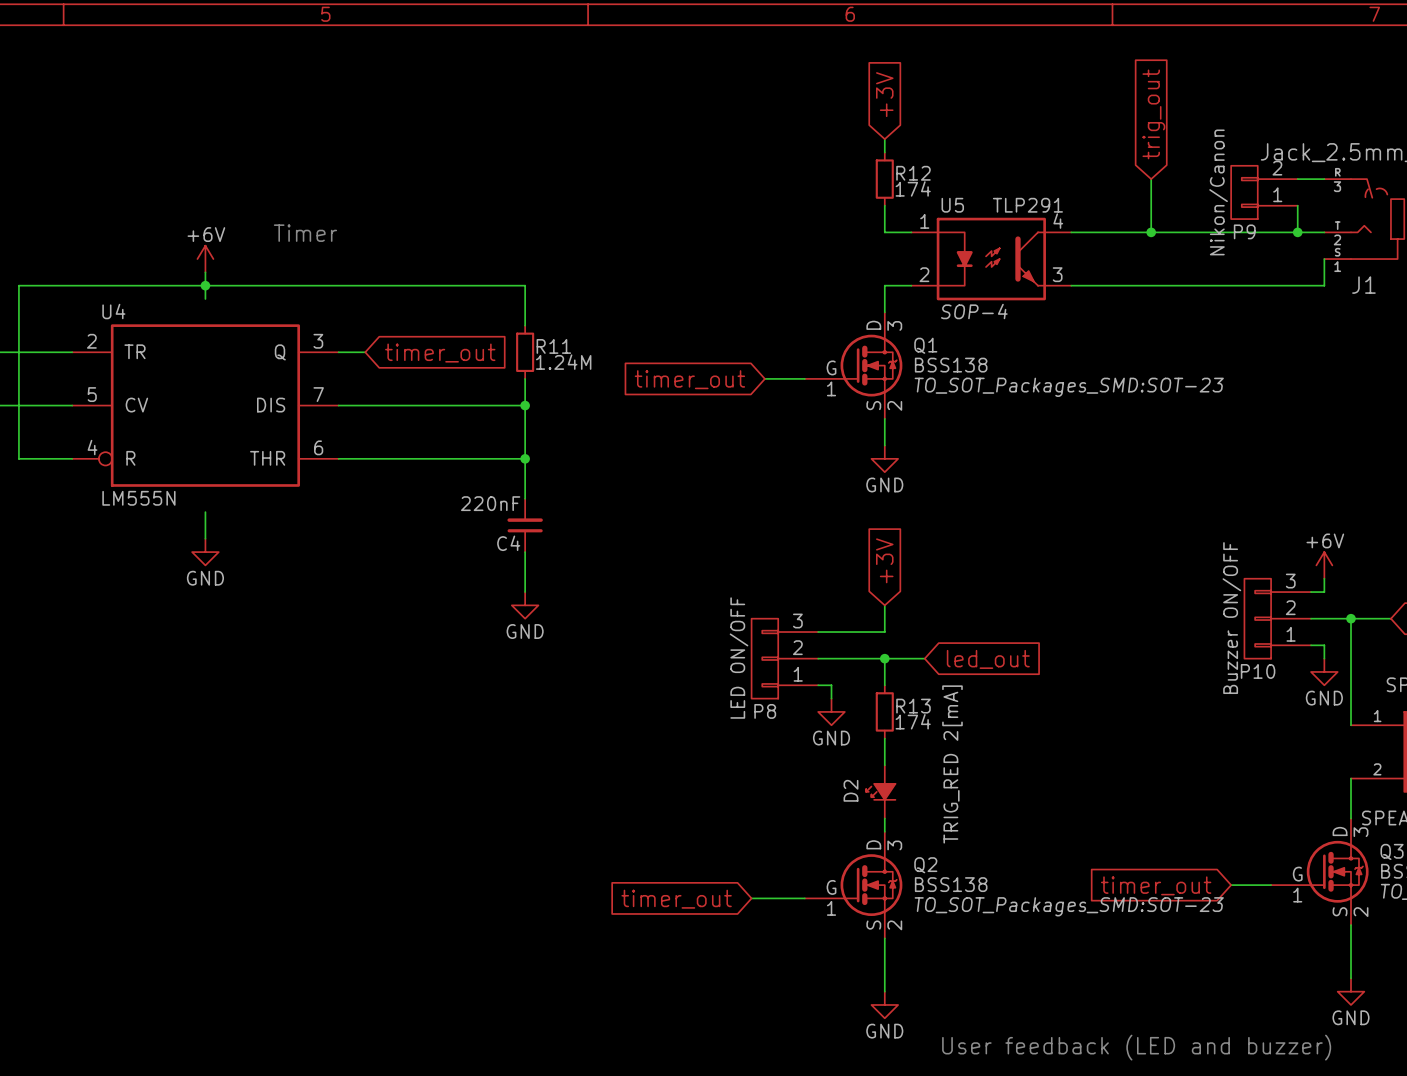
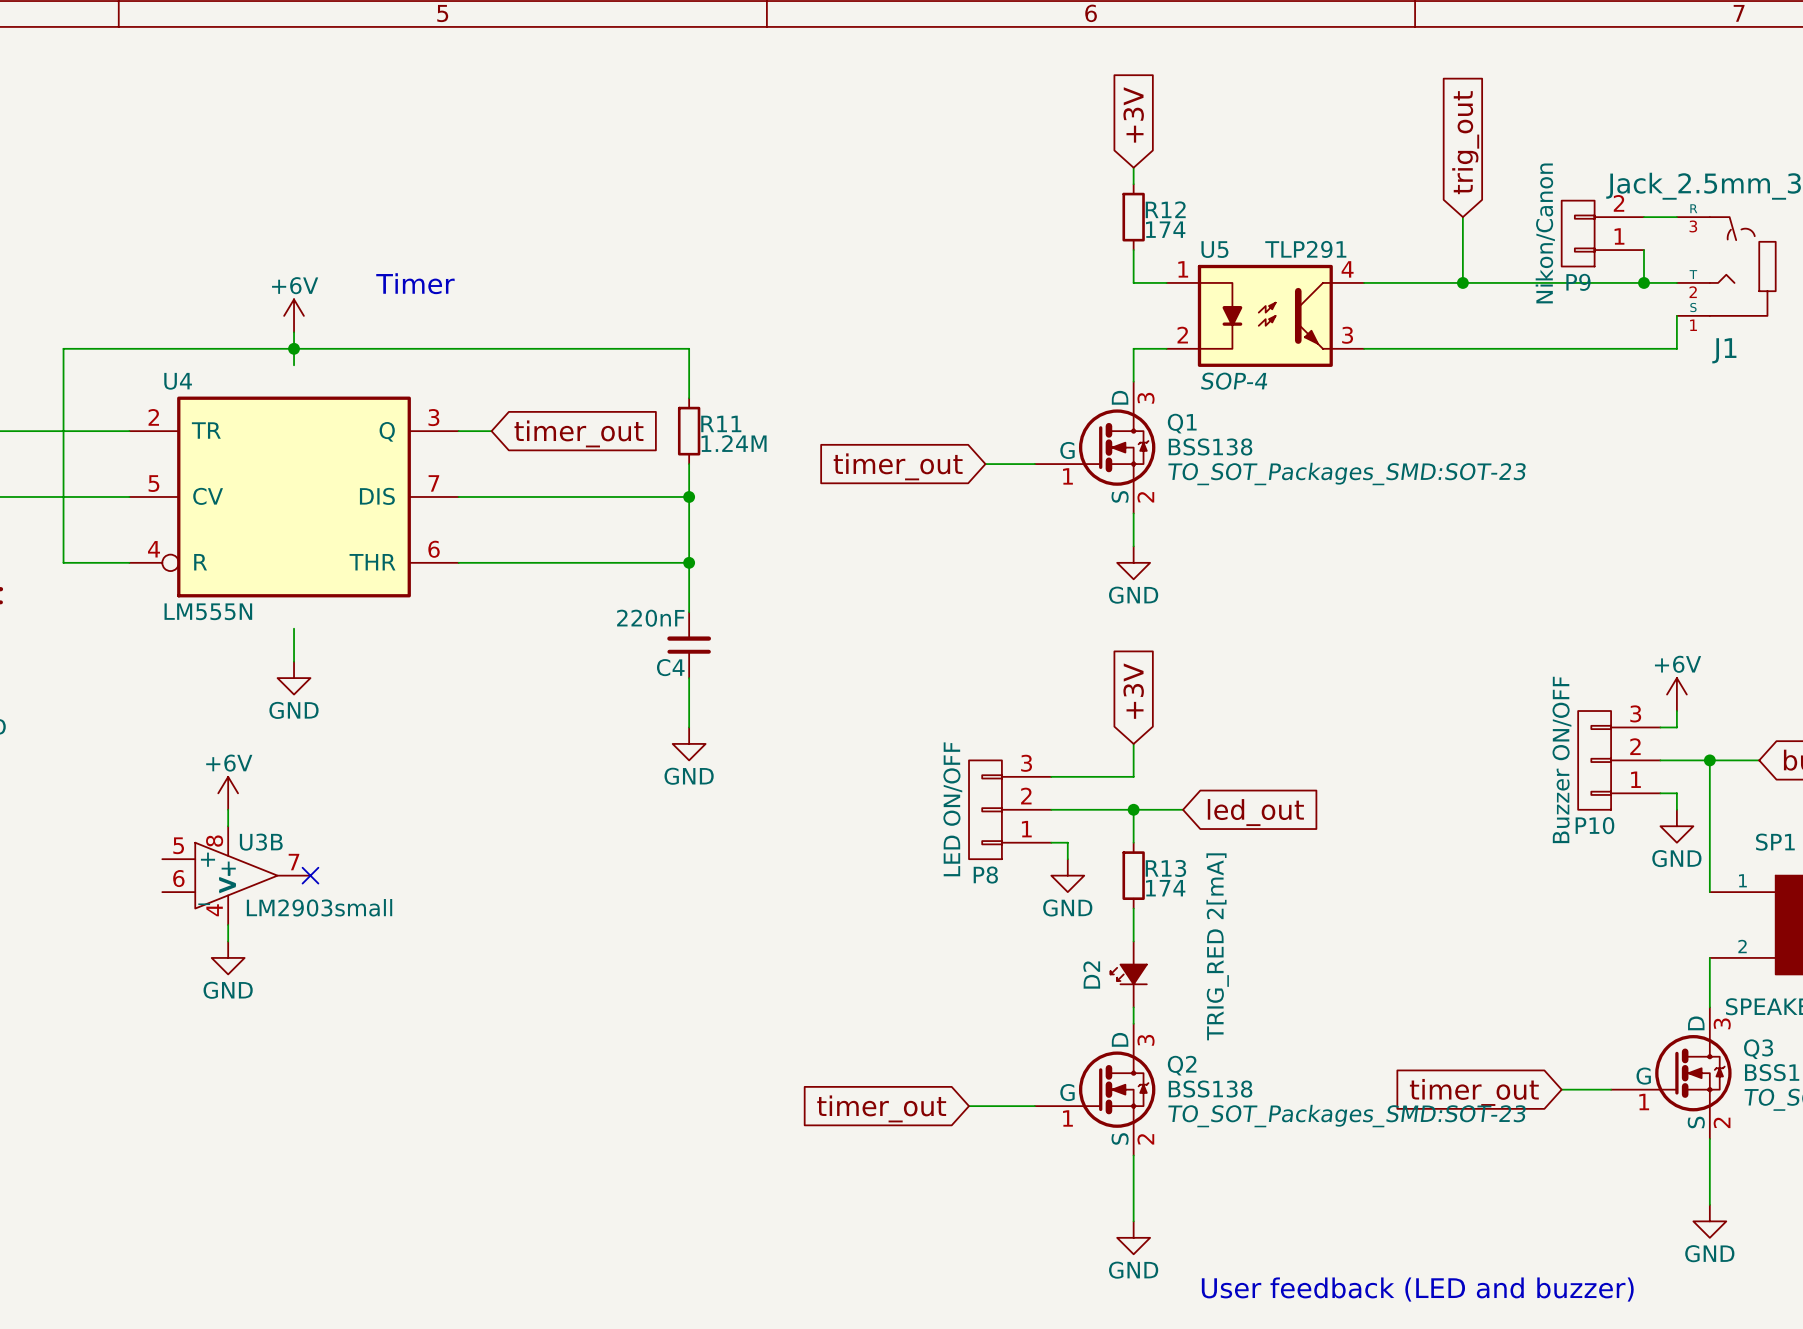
power symbol: none -> +6V (228, 793)
wire: none -> (228, 809) (228, 826)
U3B: none -> LM2903small (236, 875)
no-connect mark: none -> (310, 875)
wire: none -> (228, 925) (228, 941)
power symbol: none -> GND (228, 957)

